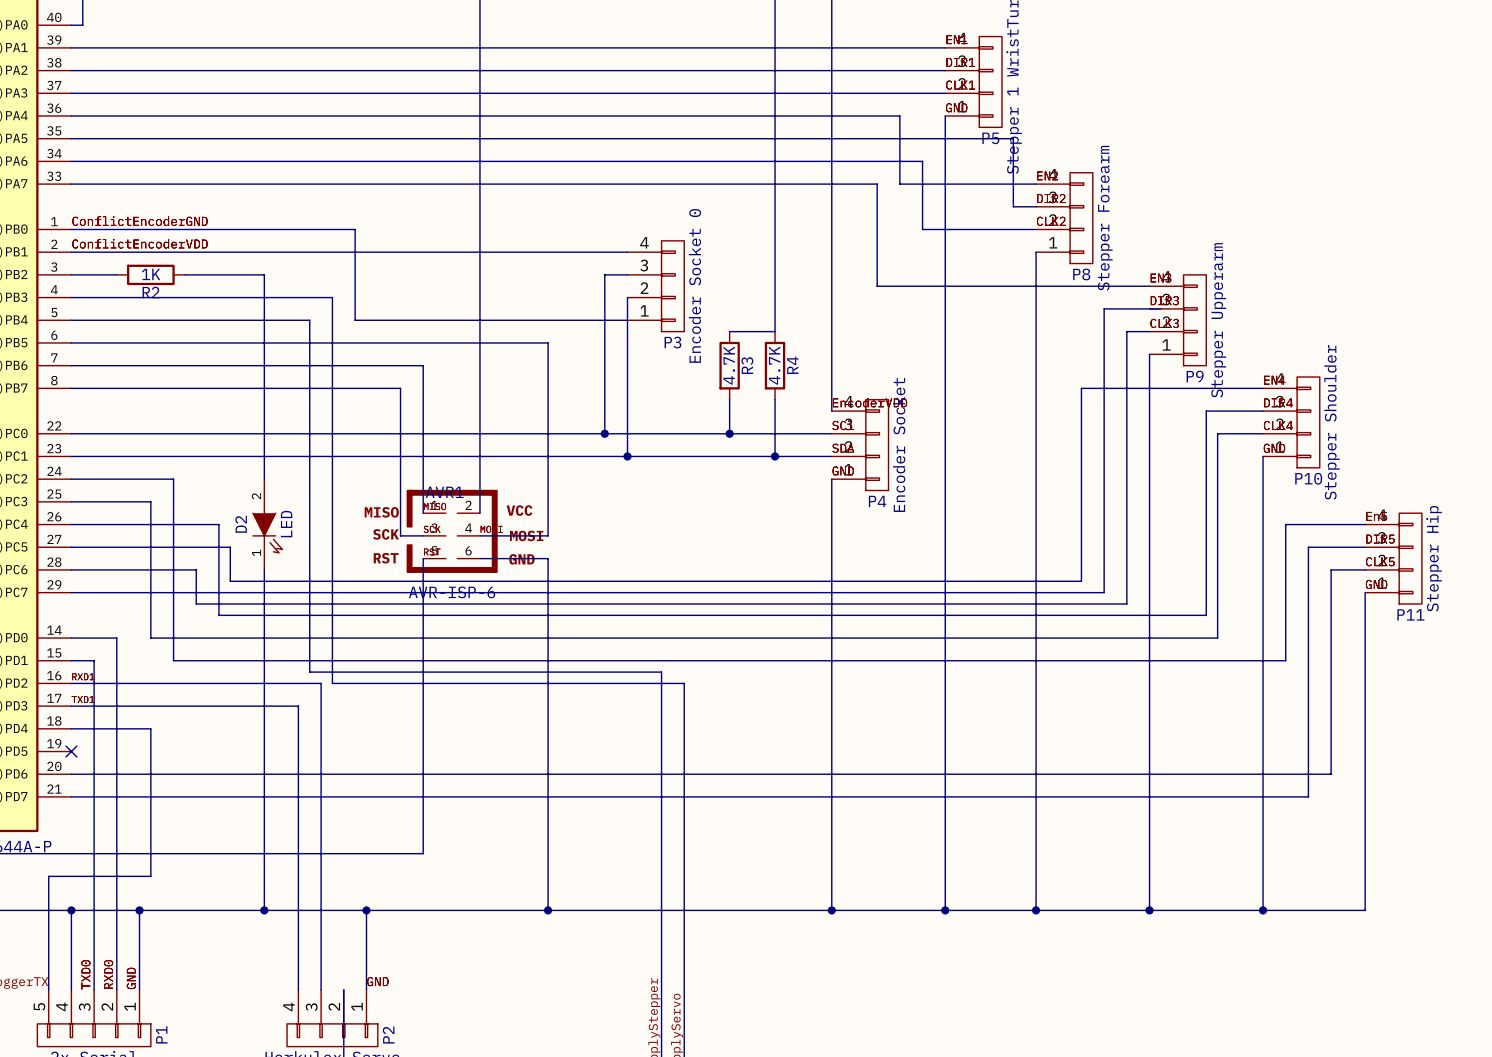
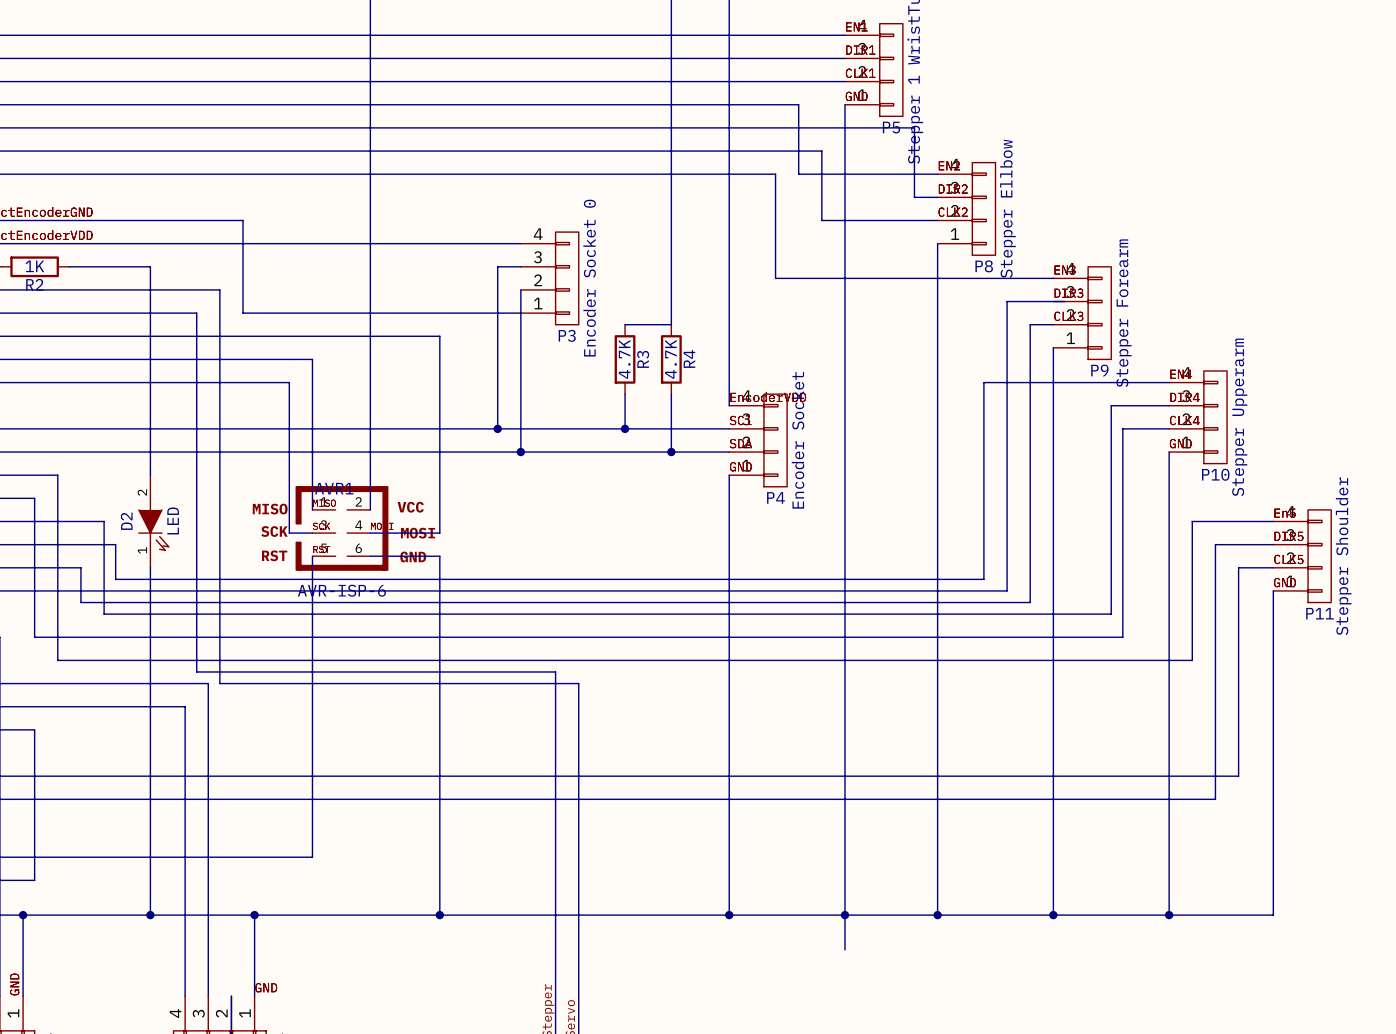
P8 value: Stepper Forearm (1105, 218) -> Stepper Ellbow (1007, 208)
P9 value: Stepper Upperarm (1218, 320) -> Stepper Forearm (1123, 313)
P10 value: Stepper Shoulder (1331, 422) -> Stepper Upperarm (1239, 417)
P11 value: Stepper Hip (1434, 558) -> Stepper Shoulder (1343, 556)
wire: none -> (844, 915) (844, 949)

